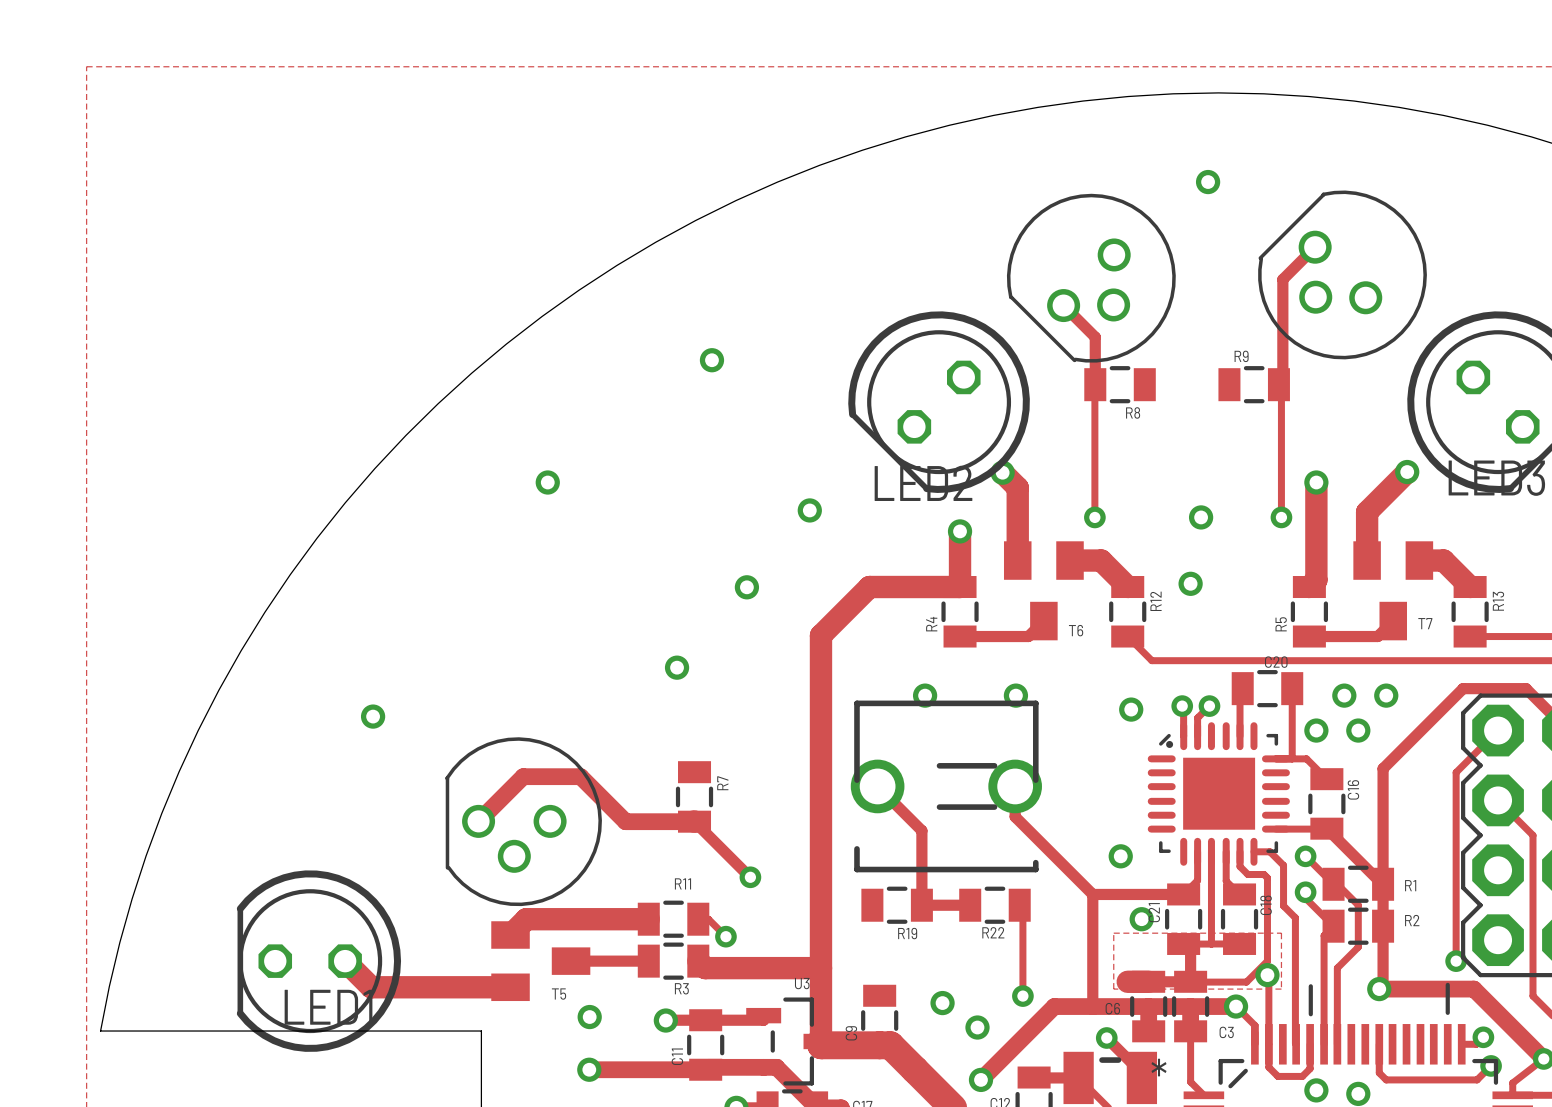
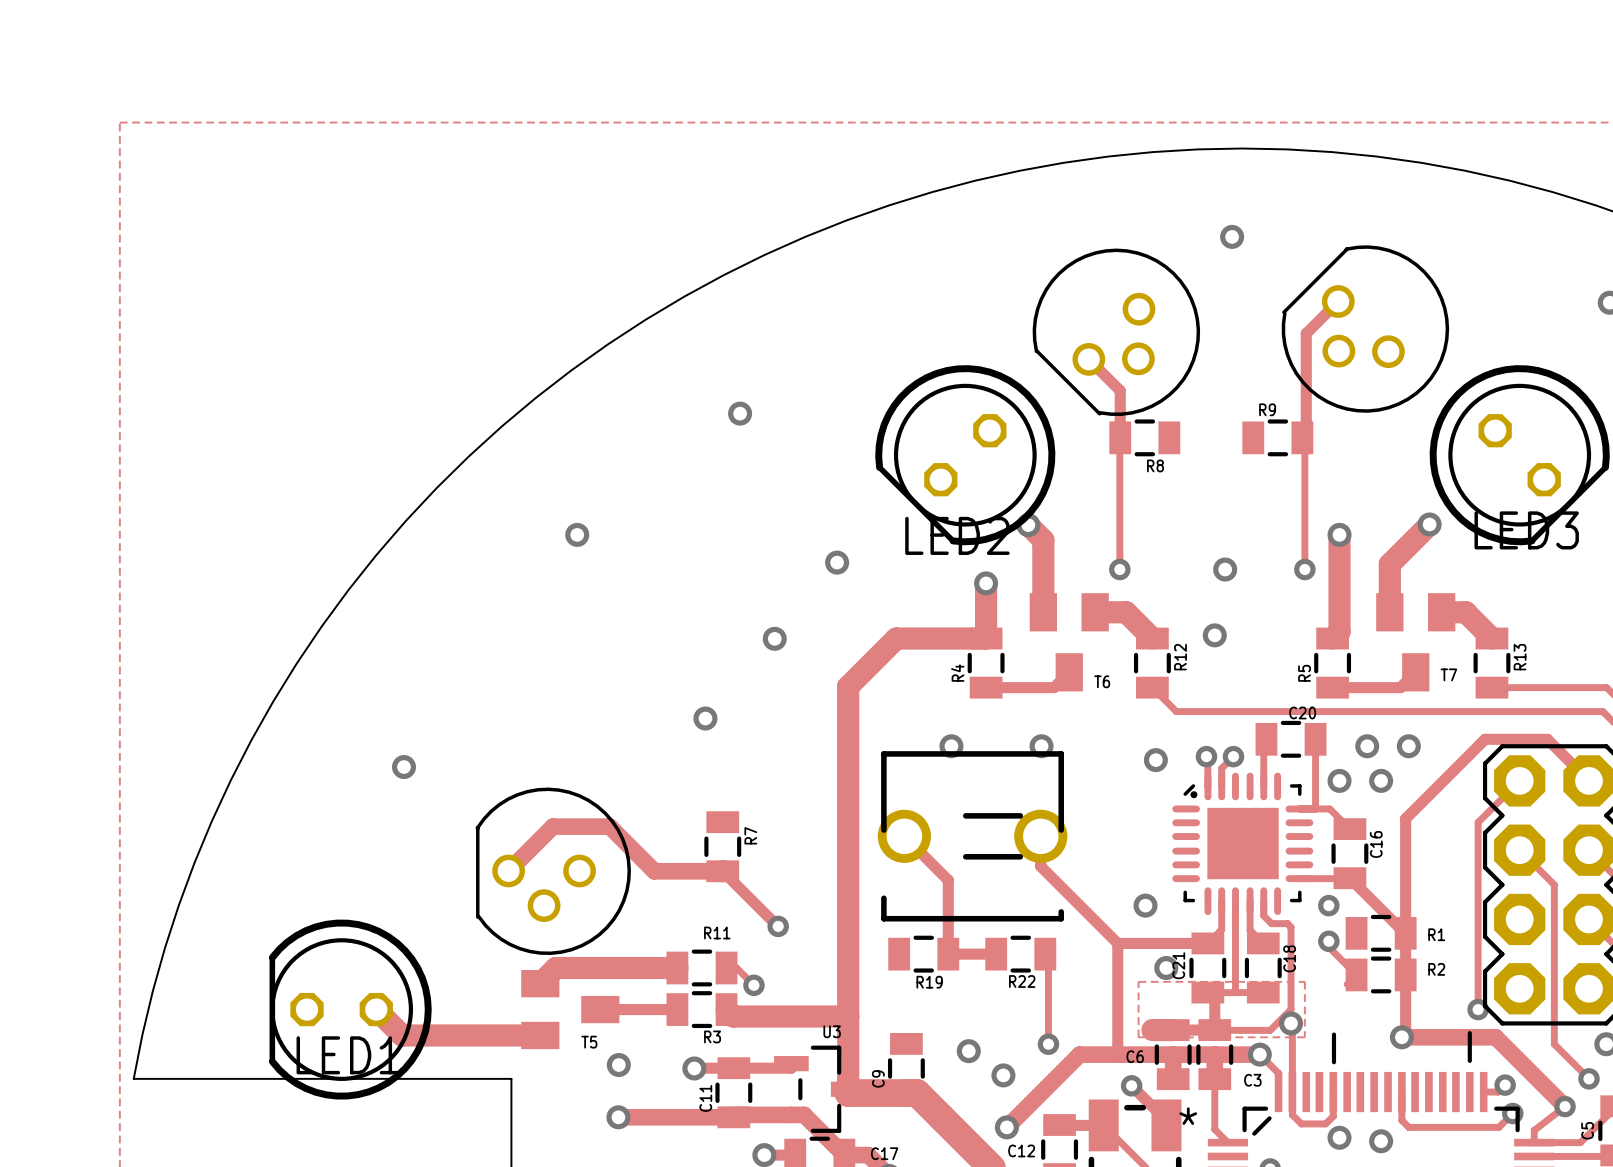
track: (1253, 851) (1269, 851) (1283, 865) (1283, 905) (1295, 917) (1296, 1044) -> none
track: (1305, 856) (1358, 905) (1358, 947) (1337, 968) (1337, 1044) -> none
track: (1324, 935) (1324, 1044) -> none

